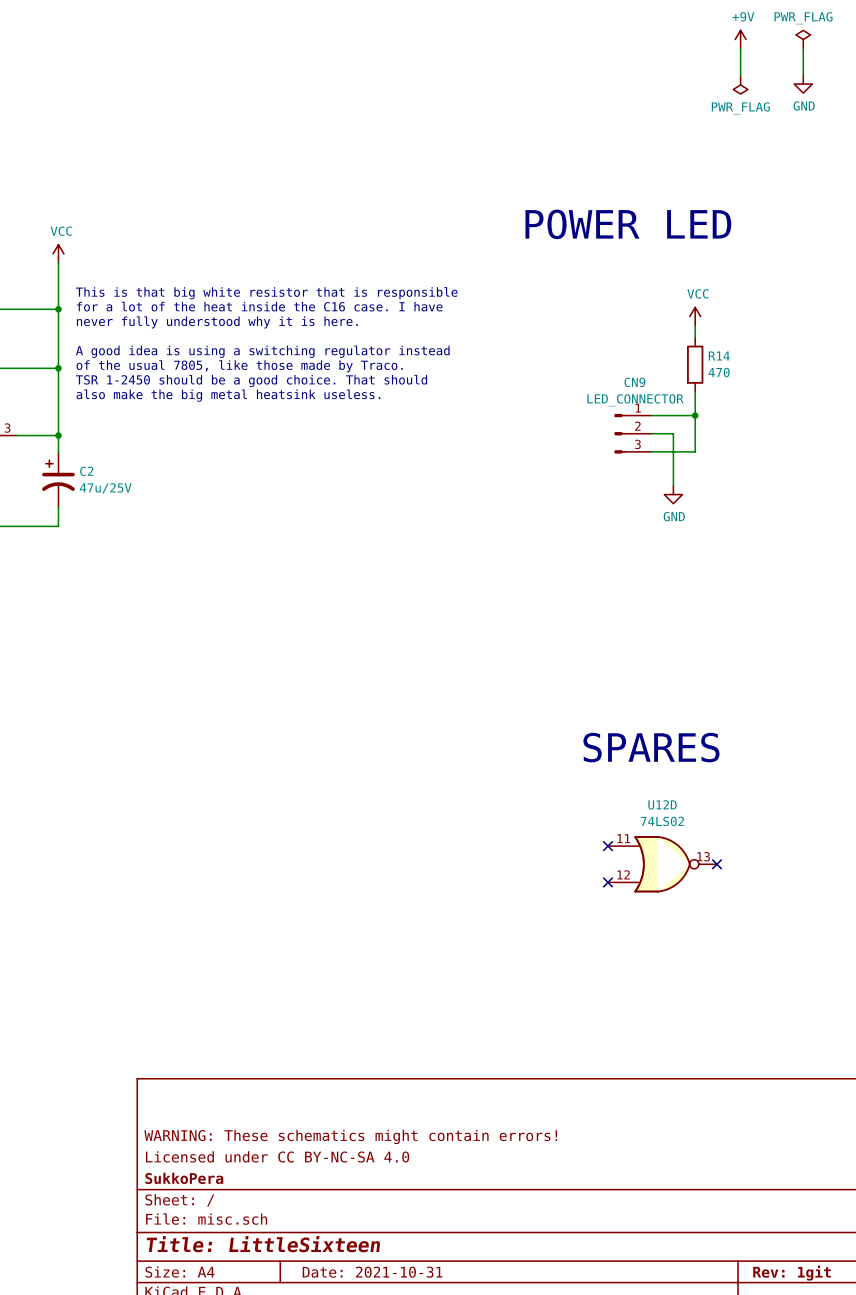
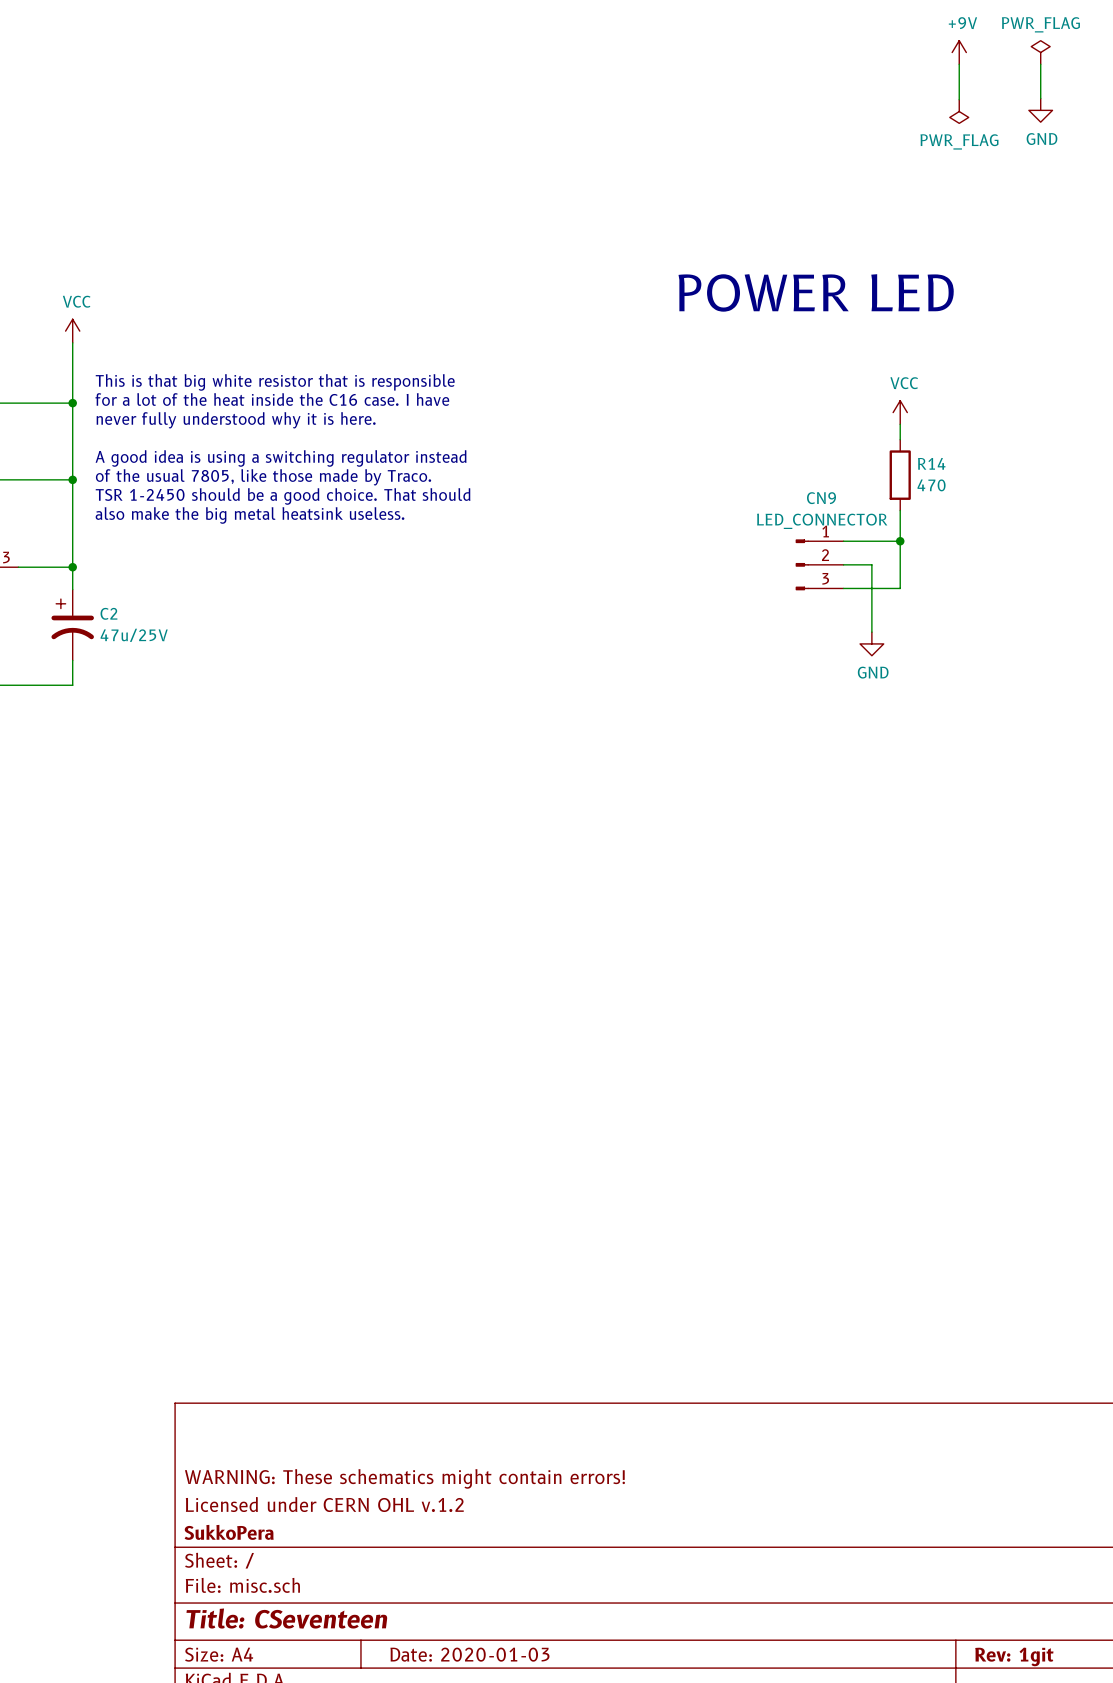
text: SPARES (651, 747) -> none
no-connect mark: (608, 846) -> none
U12D: 74LS02 (662, 864) -> none
no-connect mark: (716, 864) -> none
no-connect mark: (608, 882) -> none
title block: Licensed under CC BY-NC-SA 4.0 (277, 1156) -> Licensed under CERN OHL v.1.2 (324, 1504)
title block: Title: LittleSixteen (263, 1244) -> Title: CSeventeen (286, 1618)
title block: Date: 2021-10-31 (372, 1272) -> Date: 2020-01-03 (469, 1654)

